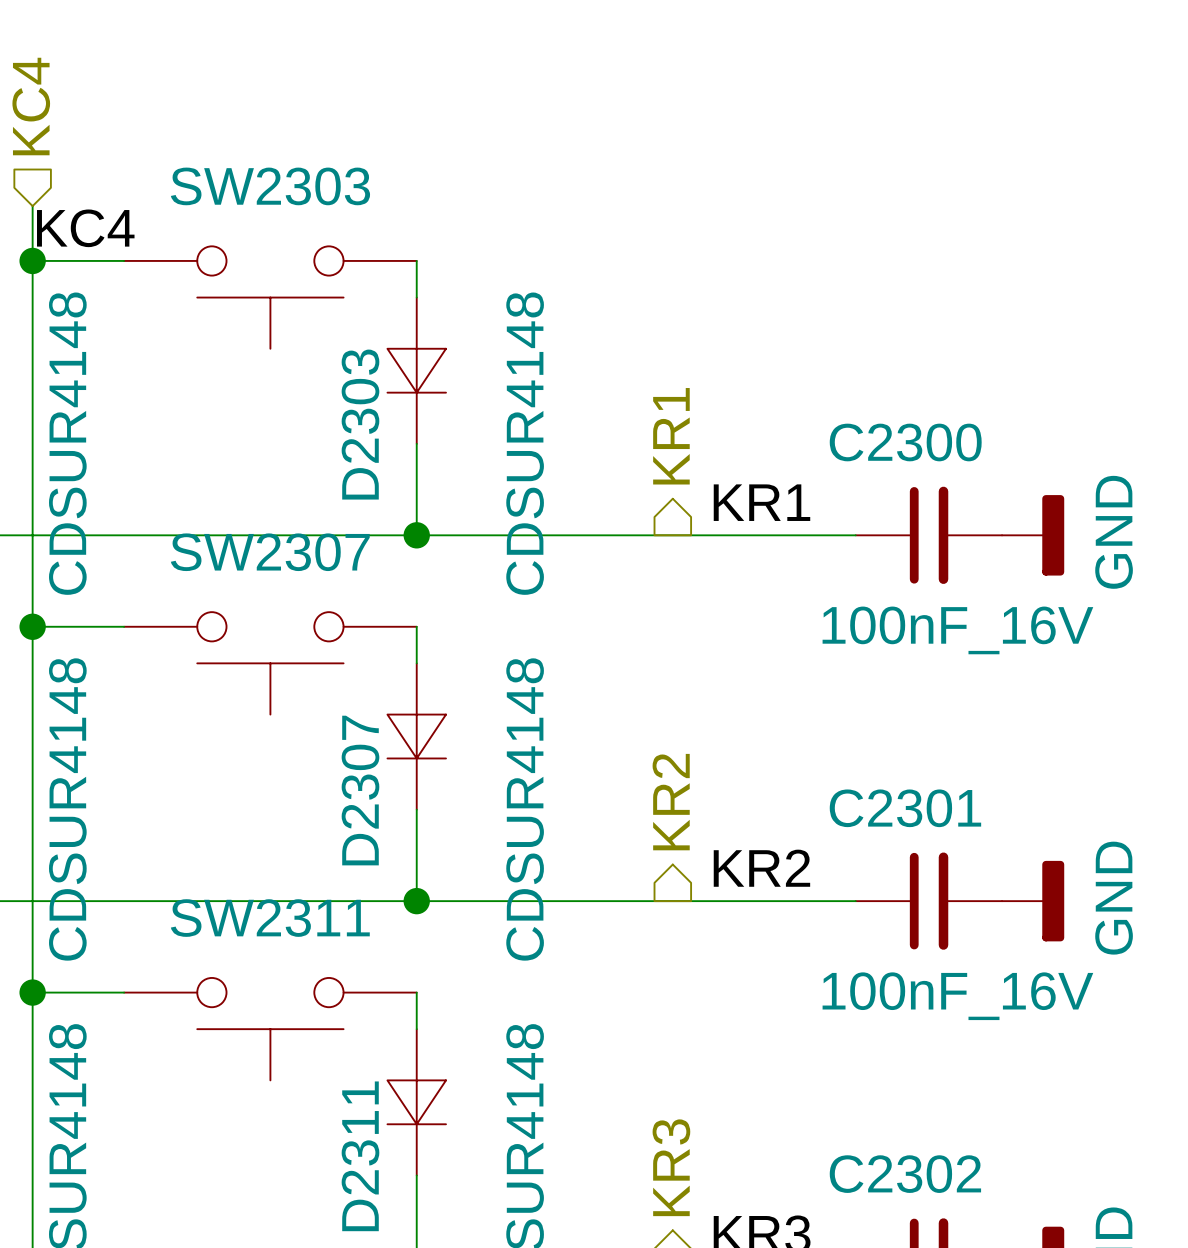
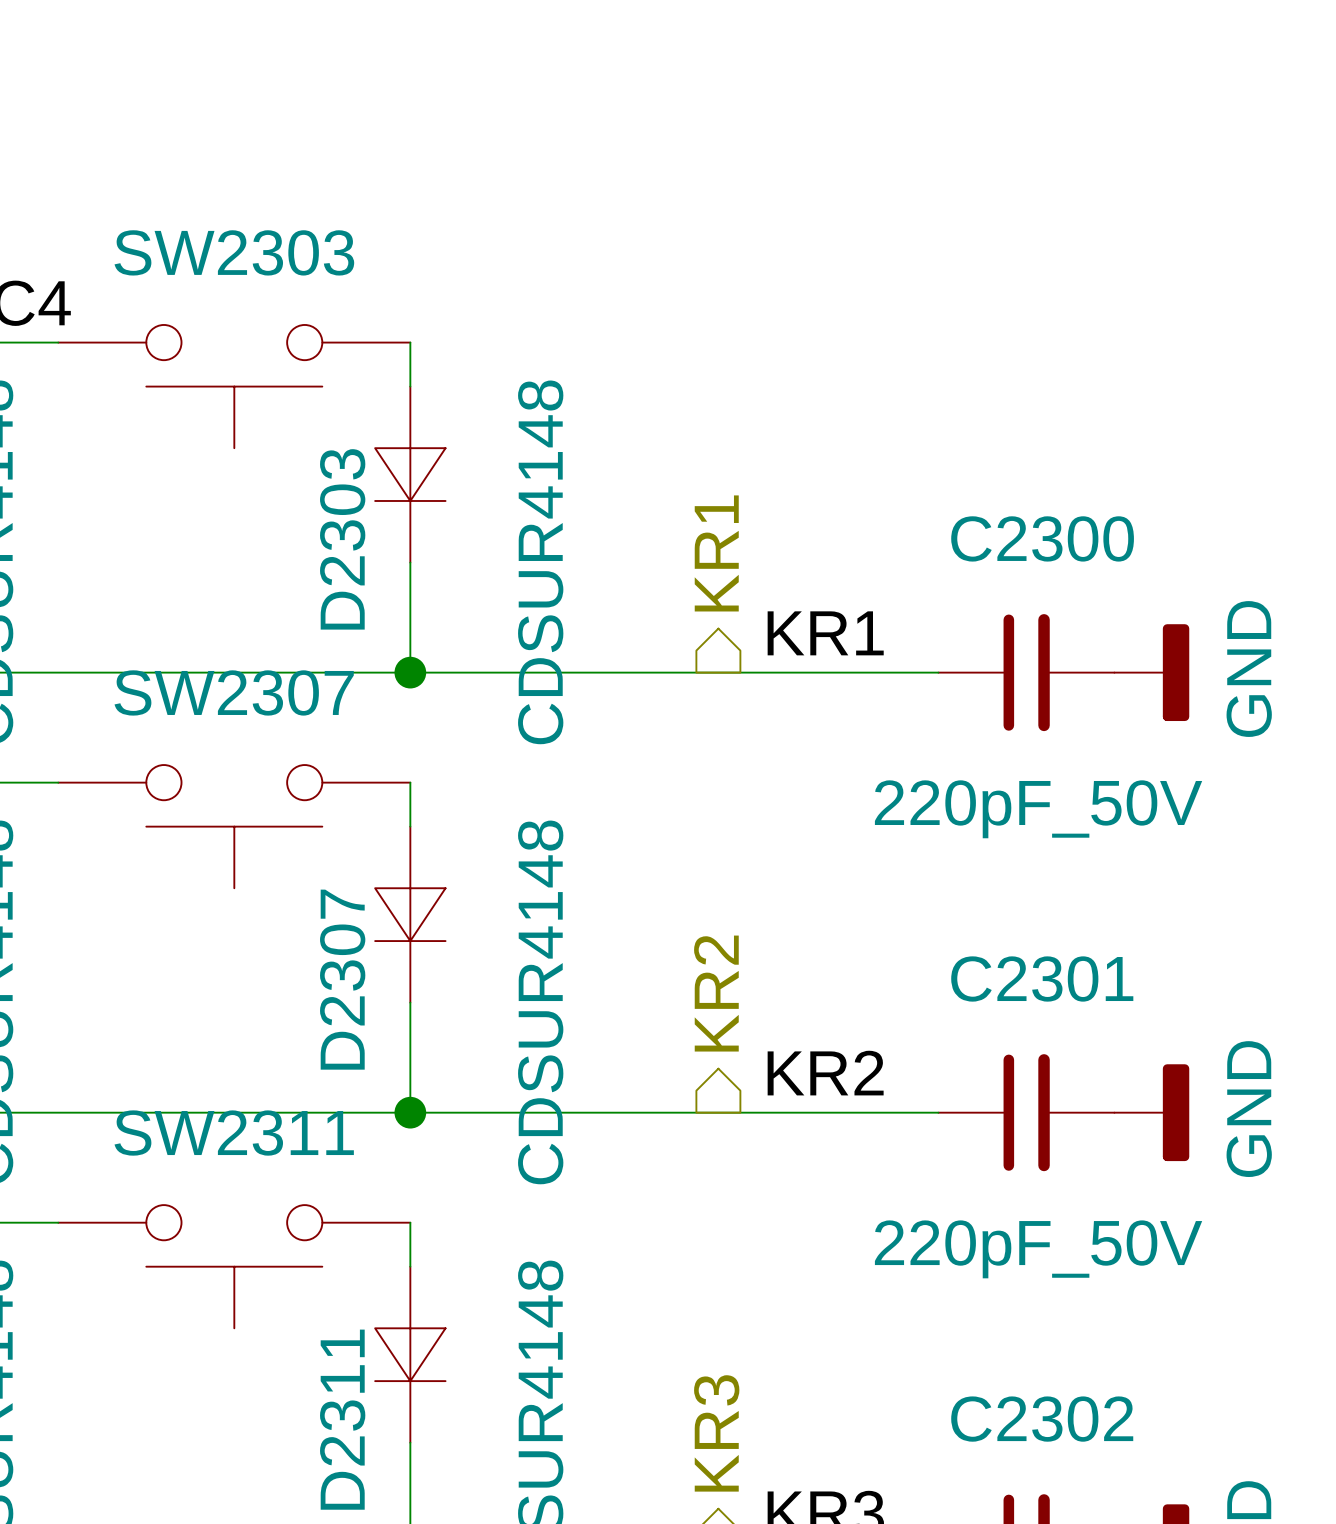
C2300 name position: C2300 (905, 442) -> C2300 (1042, 538)
C2300 value: 100nF_16V (957, 630) -> 220pF_50V (1038, 809)
C2301 name position: C2301 (905, 808) -> C2301 (1042, 979)
C2301 value: 100nF_16V (957, 996) -> 220pF_50V (1038, 1249)
C2302 name position: C2302 (905, 1174) -> C2302 (1042, 1419)

